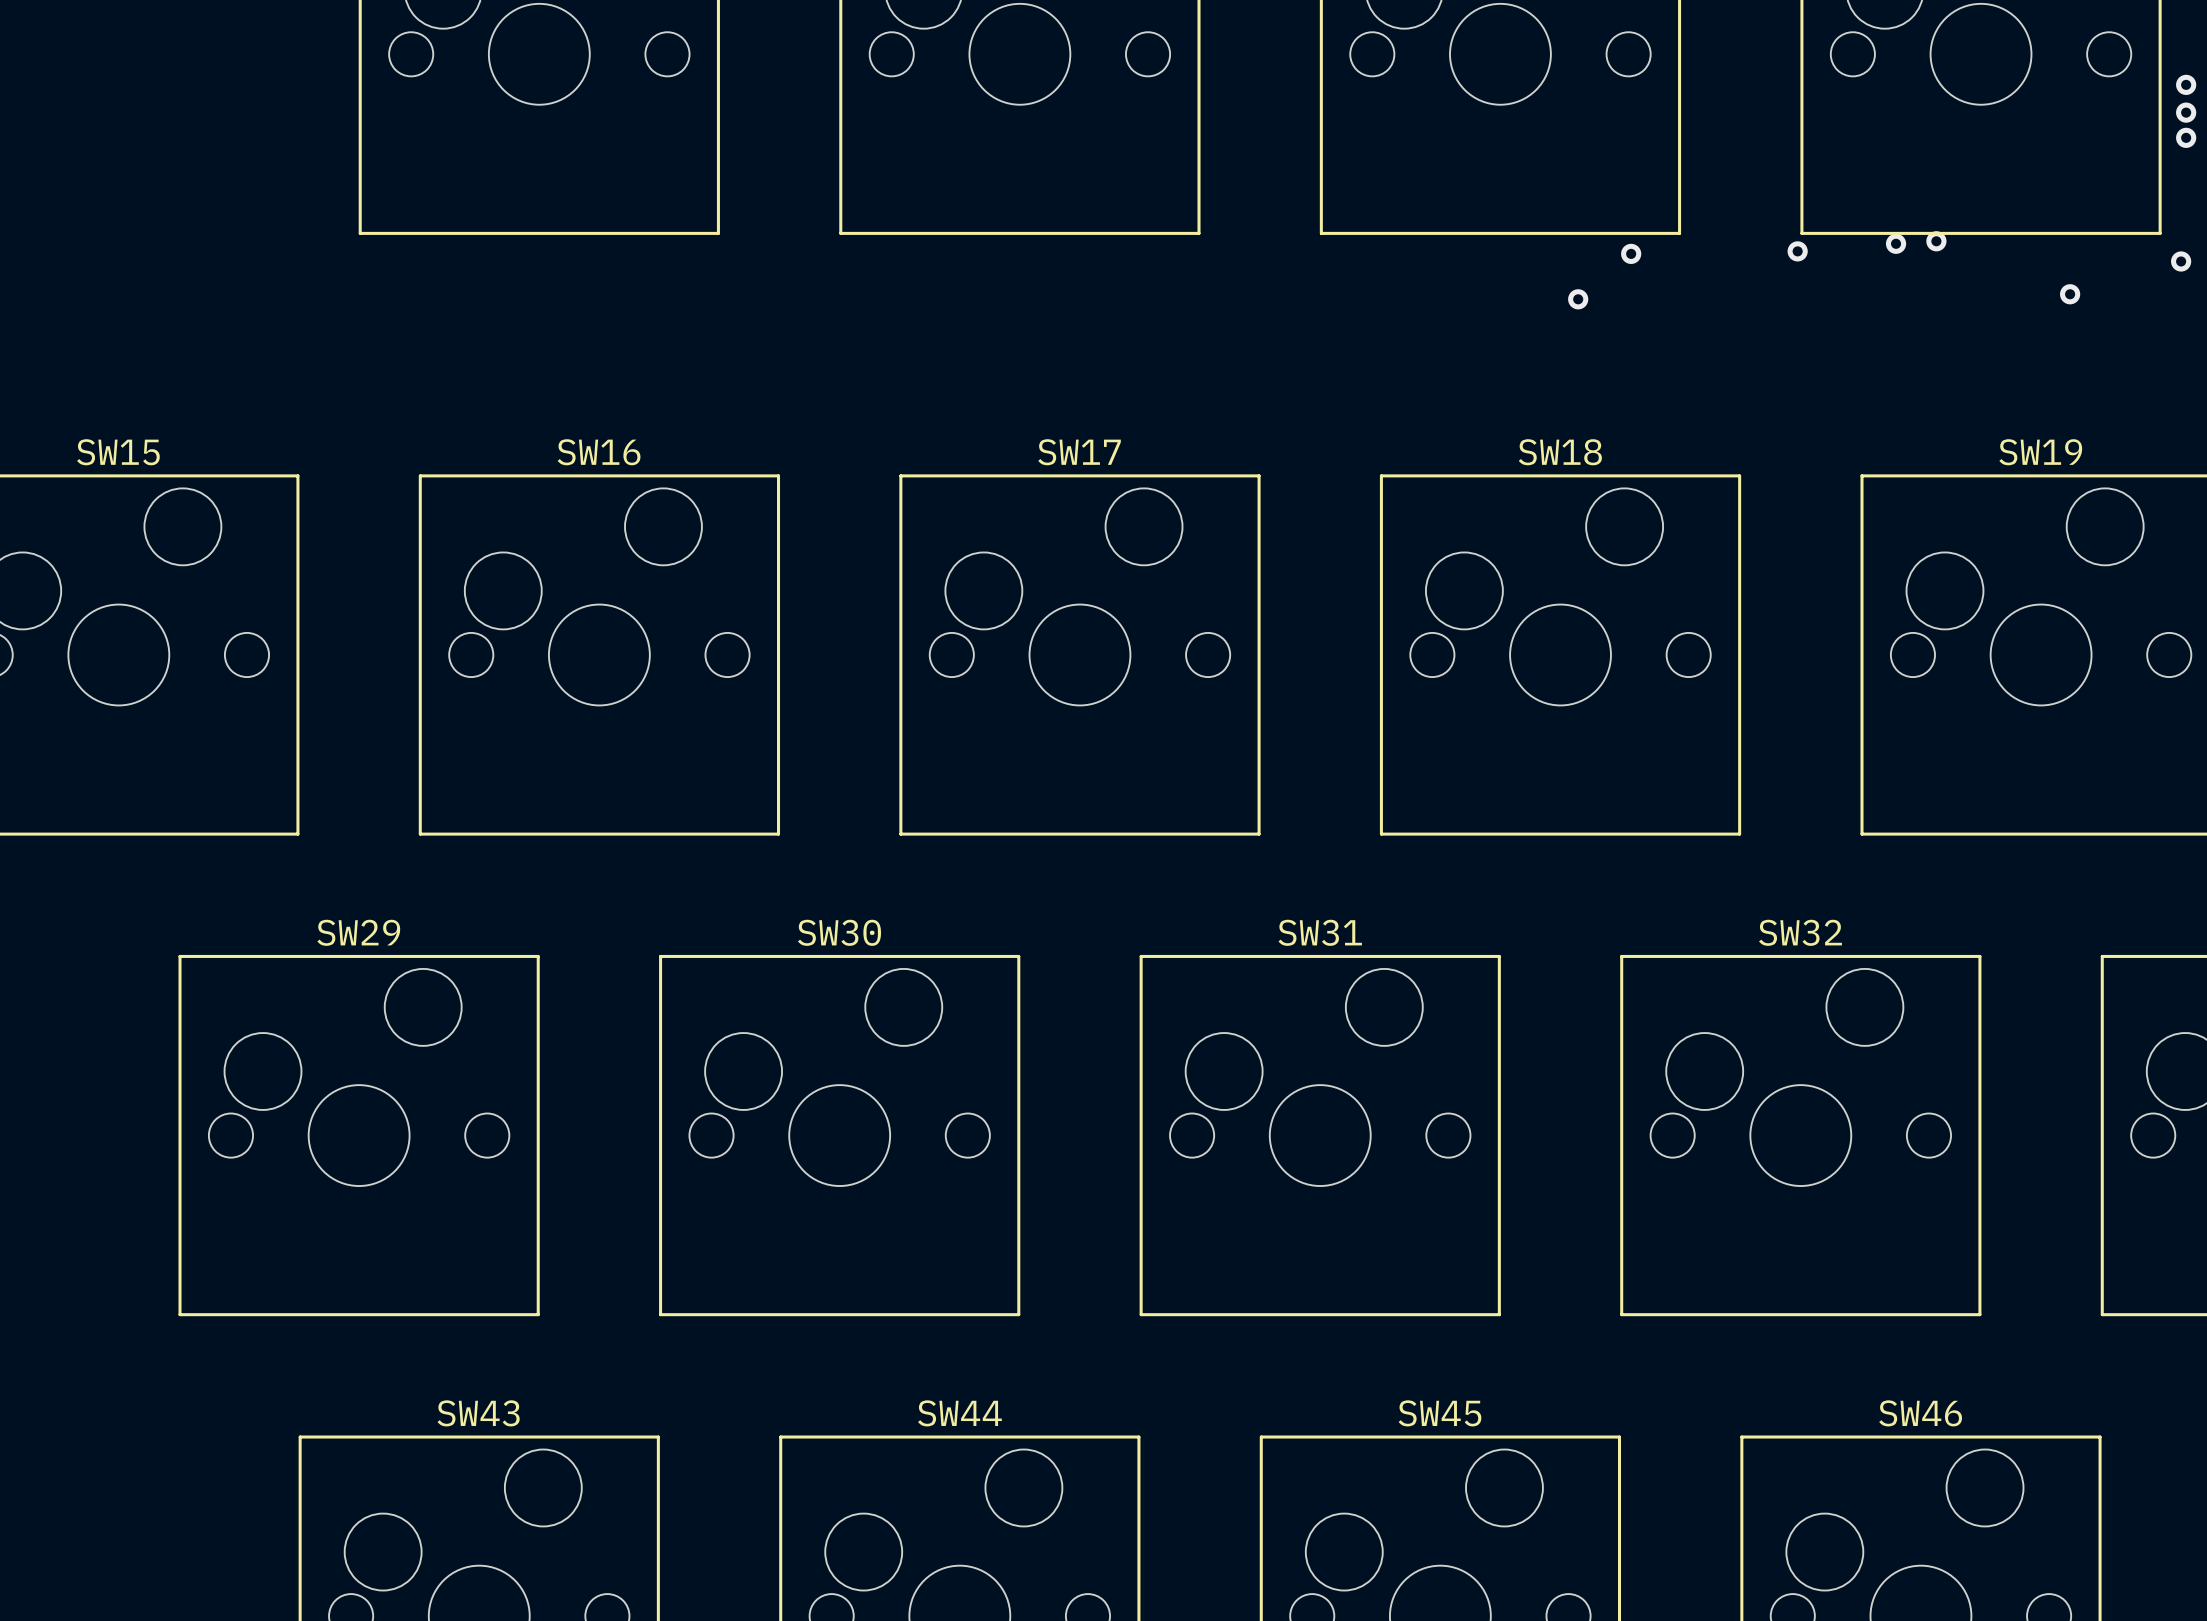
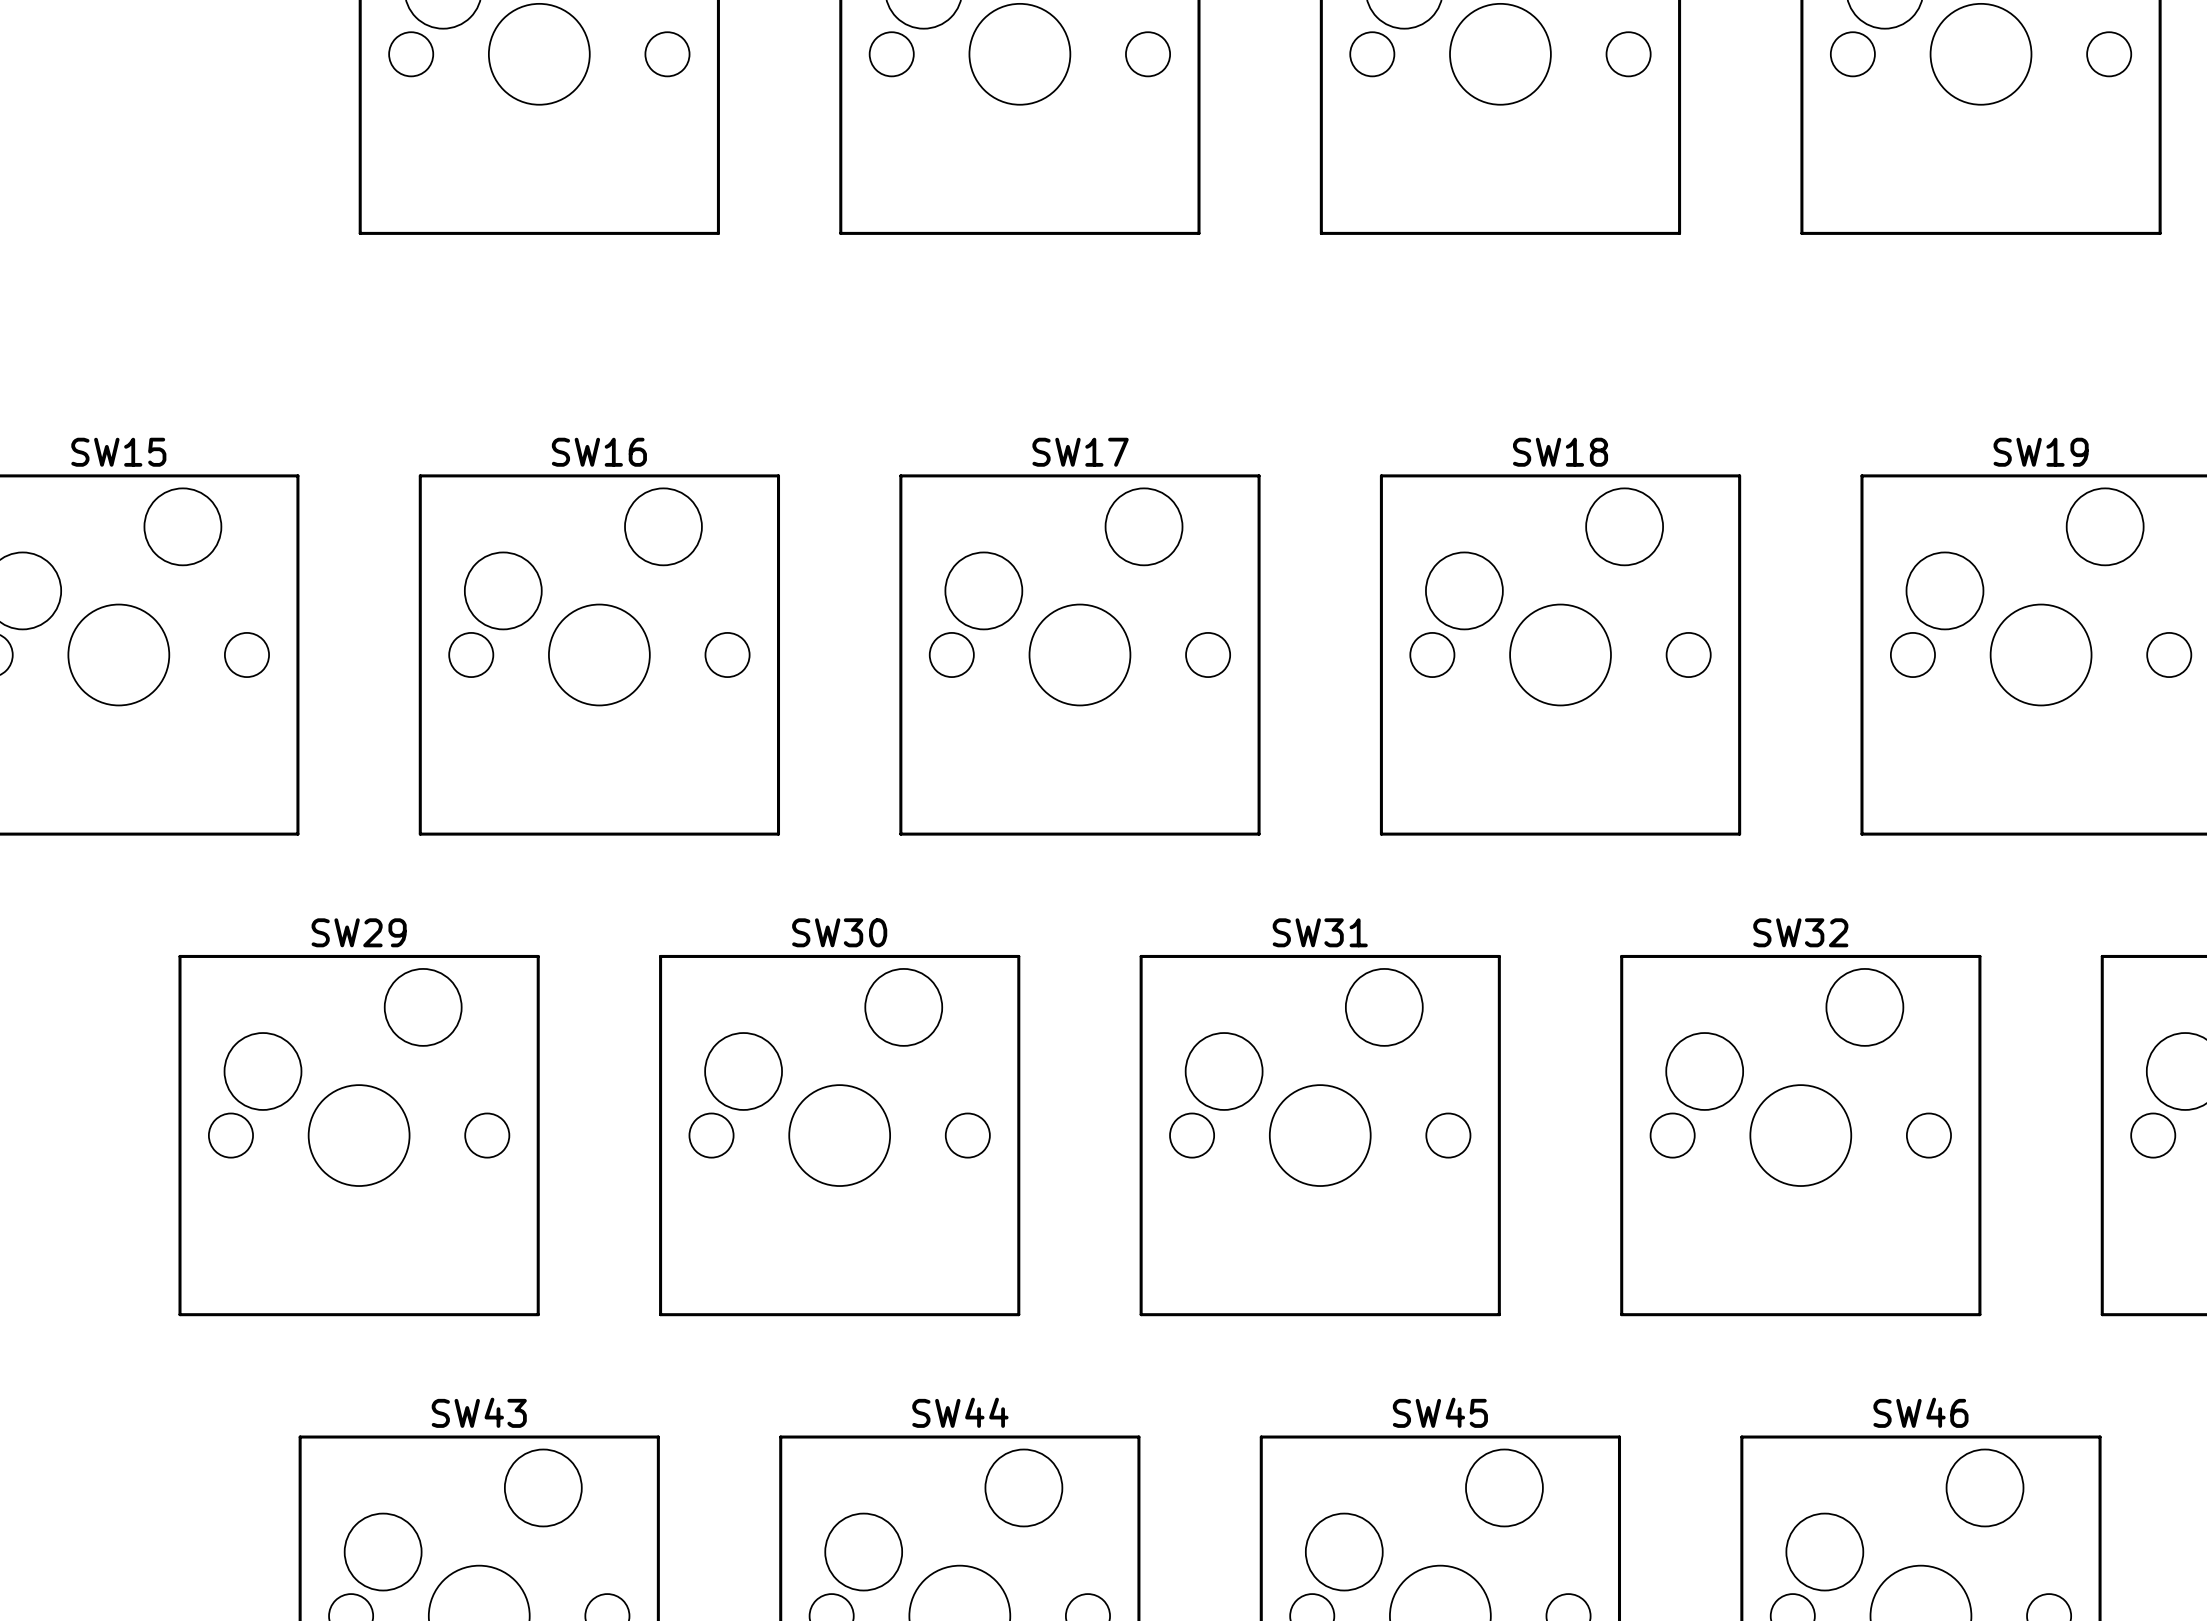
via: (2186, 84) -> none
via: (2186, 112) -> none
via: (2186, 137) -> none
via: (1936, 241) -> none
via: (1896, 243) -> none
via: (1797, 251) -> none
via: (1631, 253) -> none
via: (2181, 261) -> none
via: (2070, 294) -> none
via: (1578, 299) -> none

